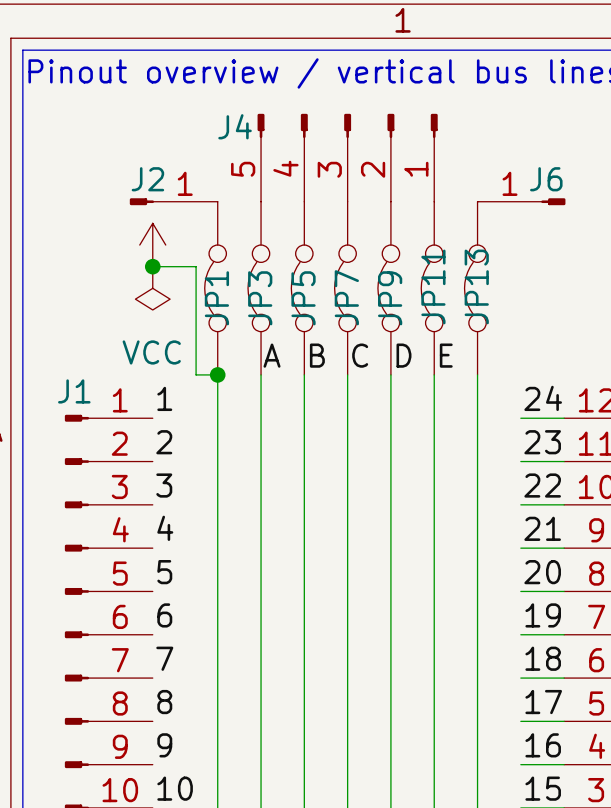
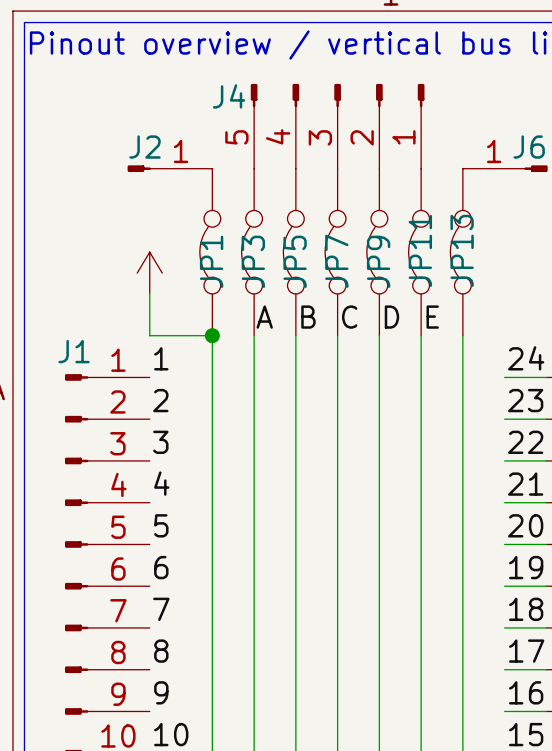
power symbol position: (152, 245) -> (149, 273)
wire: (152, 266) (196, 266) (196, 374) -> (149, 293) (149, 335) (191, 335)
junction: (152, 266) -> none
power symbol: VCC (152, 288) -> none

